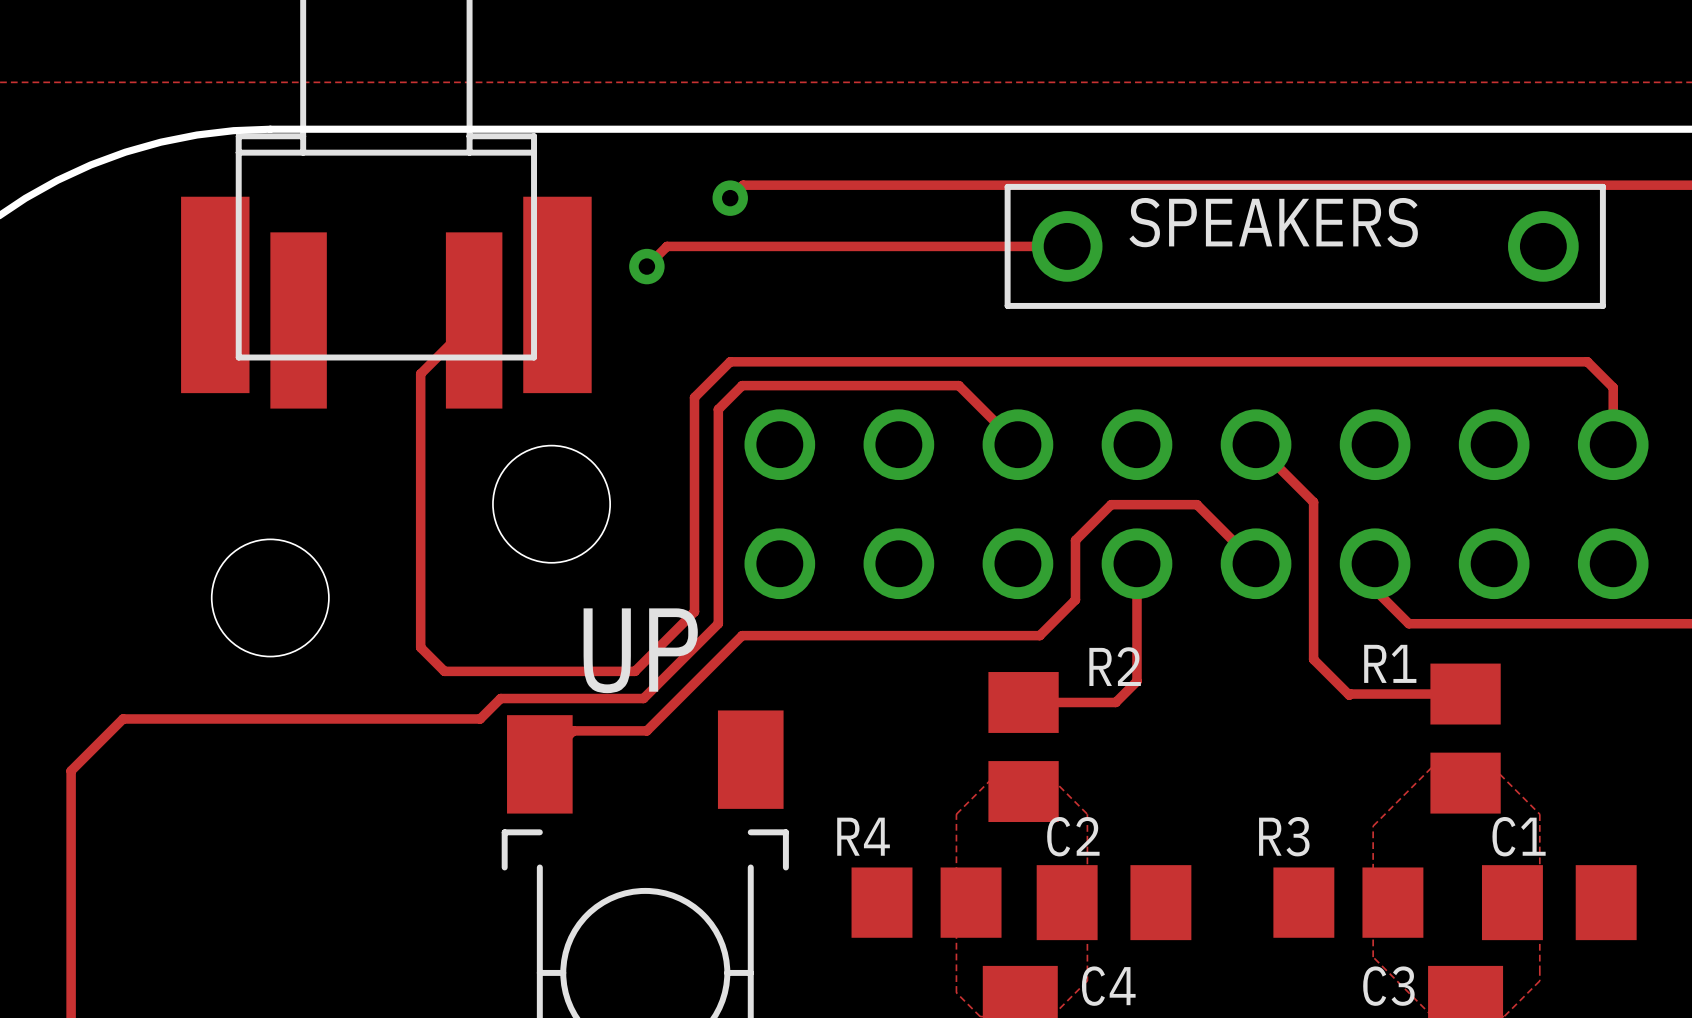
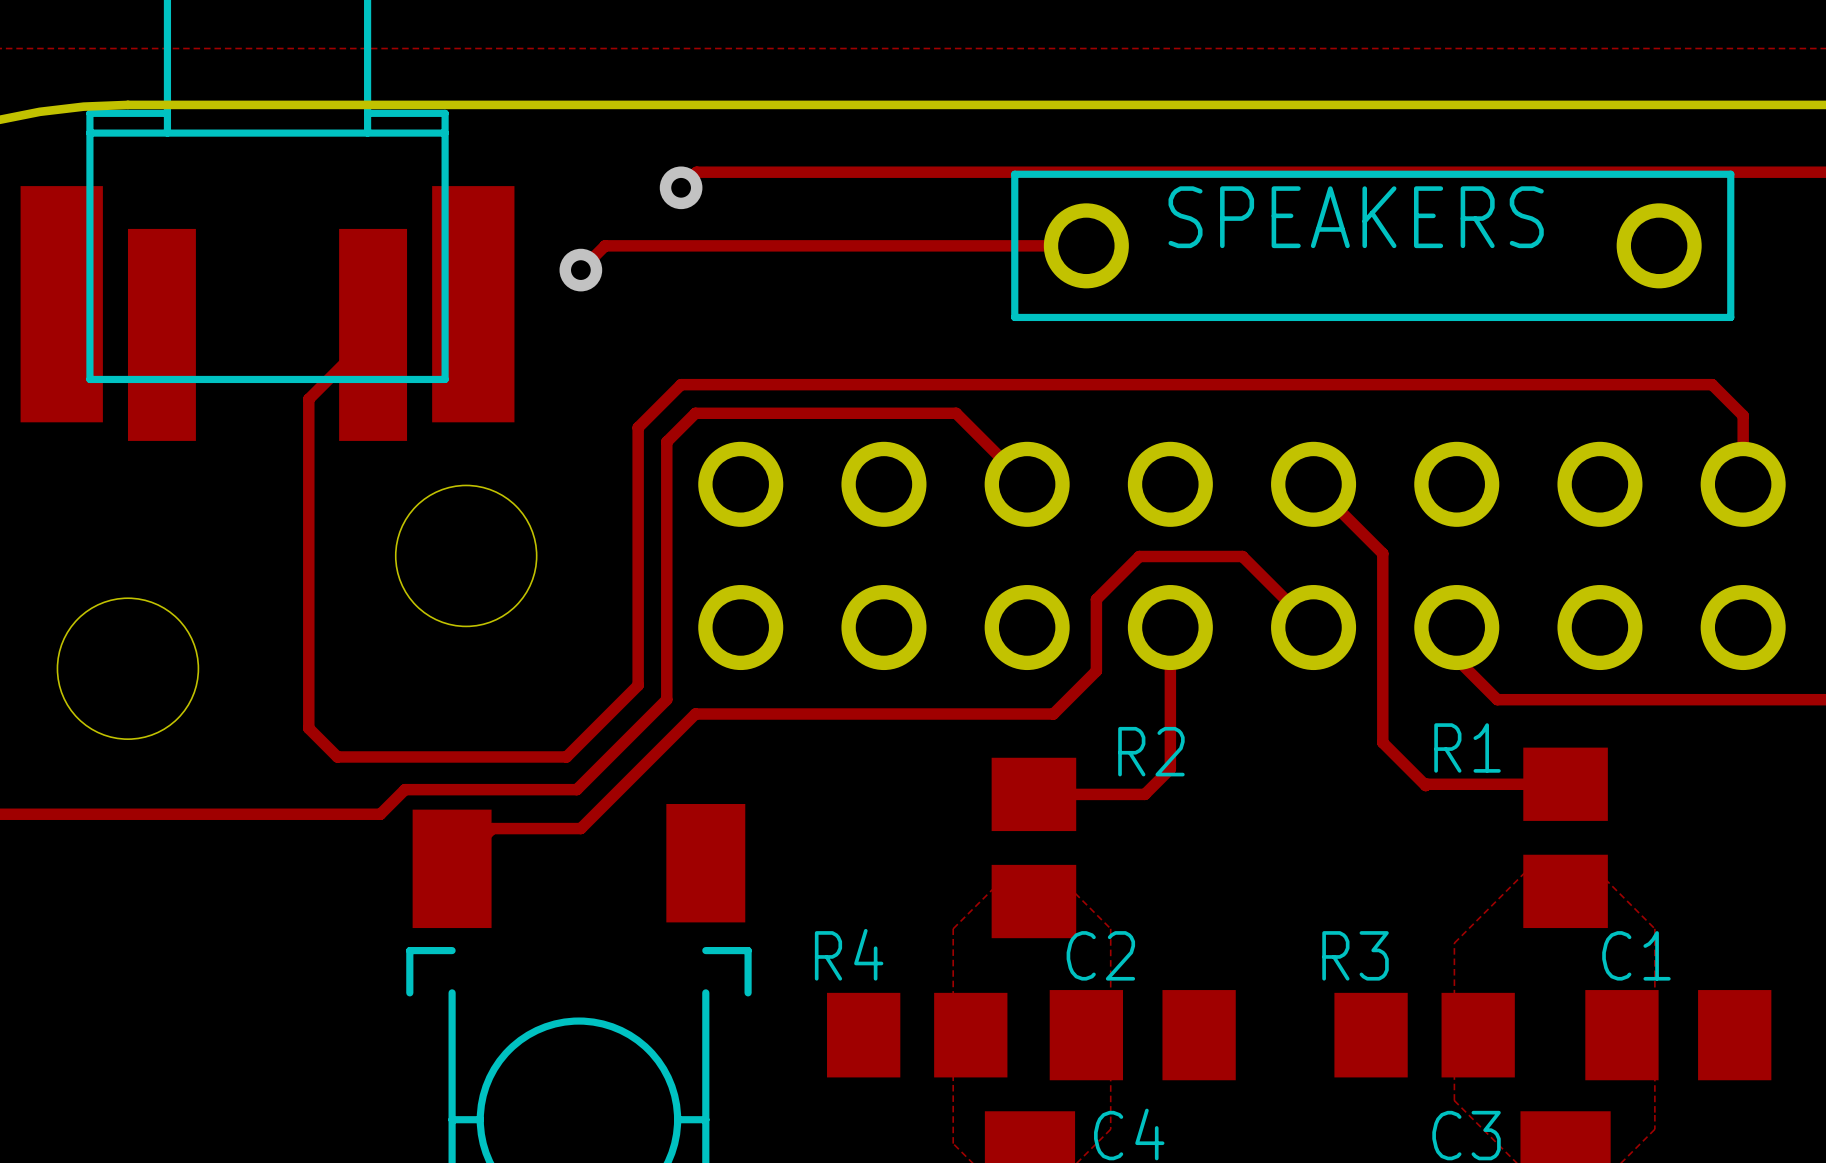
text: UP (640, 650) -> none

